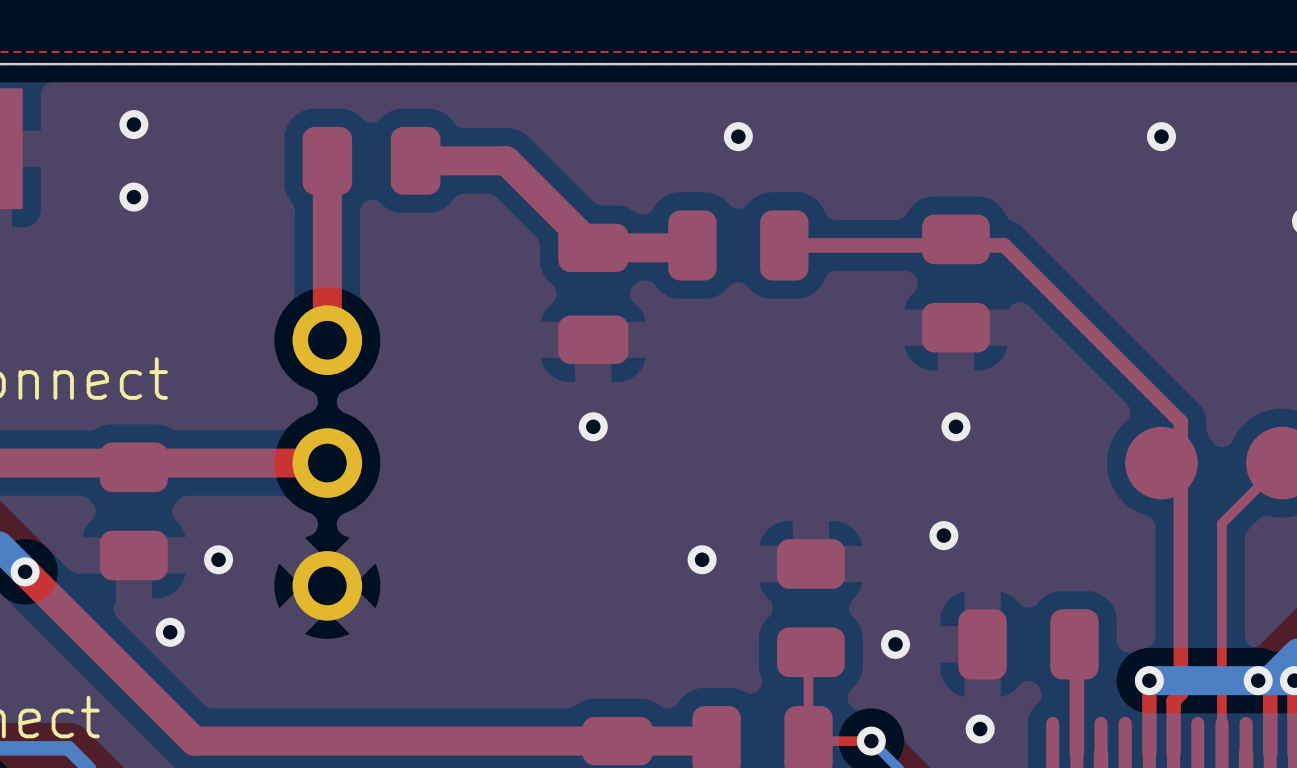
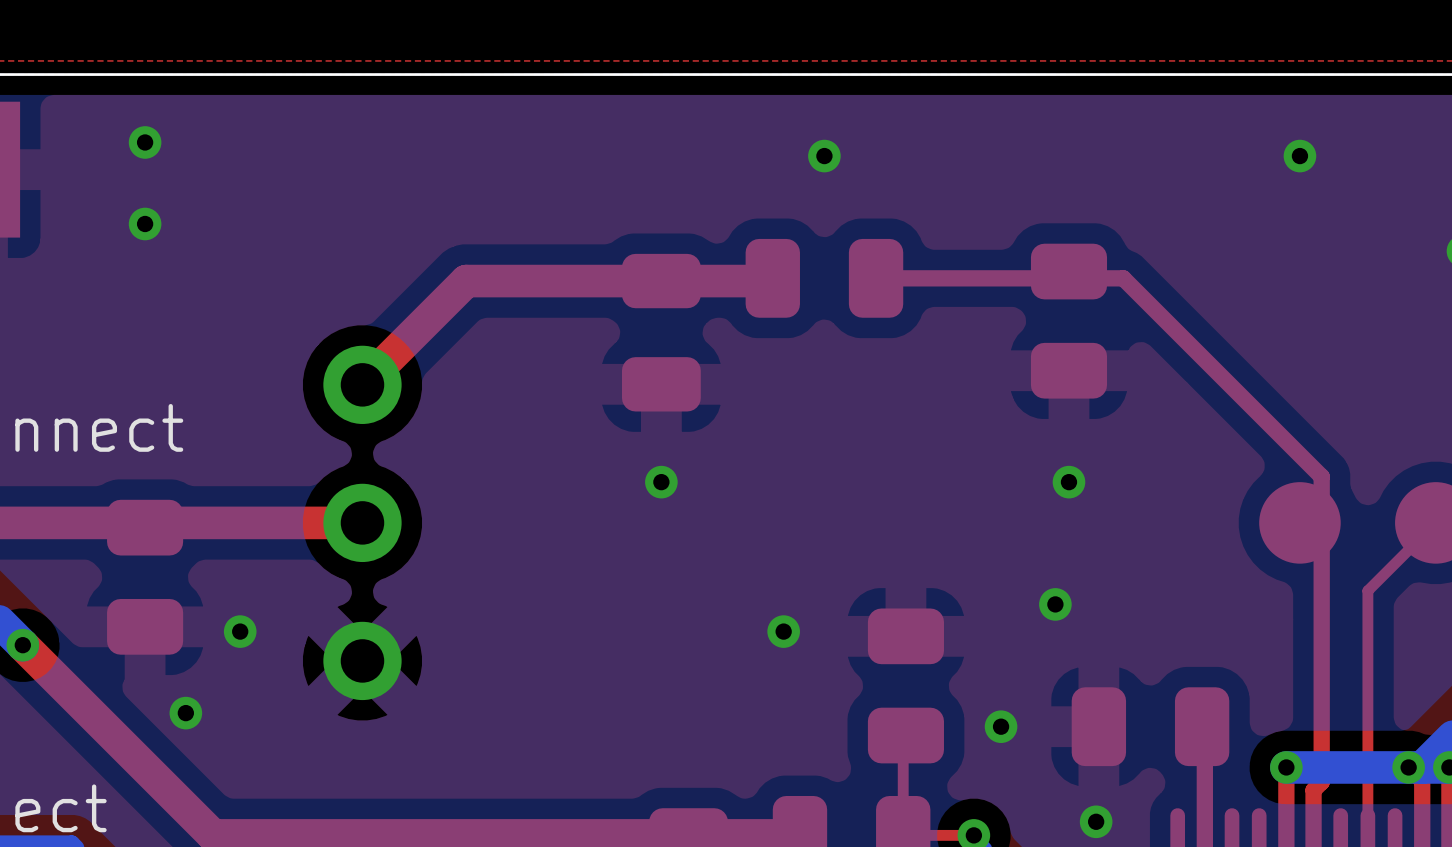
top track: (327, 160) (327, 340) -> none
part: (371, 160) -> none
top track: (415, 160) (506, 160) (593, 247) -> (362, 384) (466, 281) (661, 281)

